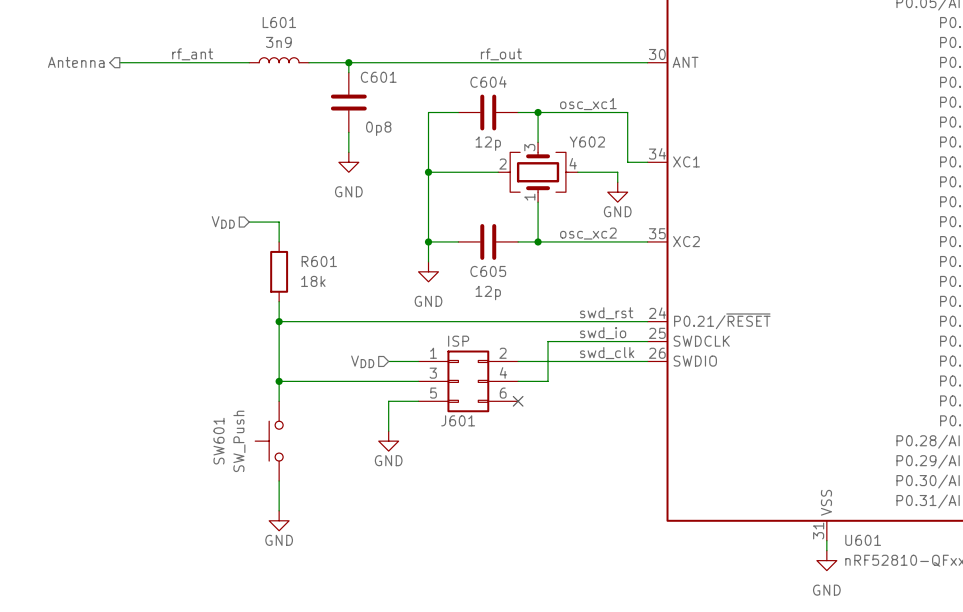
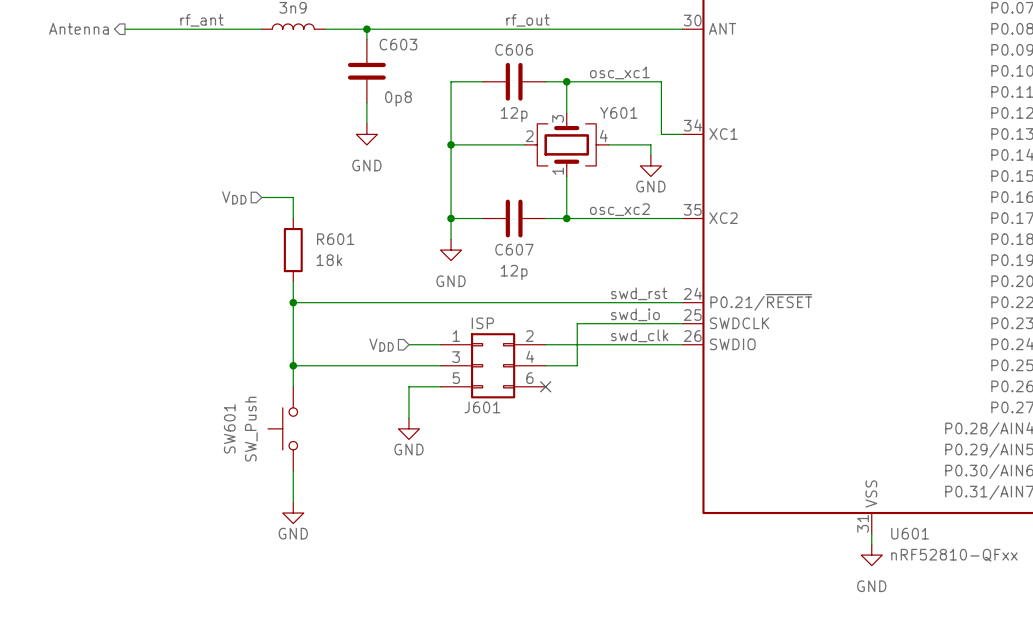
C601 name: C601 (378, 77) -> C603 (398, 44)
C604 name: C604 (488, 82) -> C606 (514, 49)
Y602 name: Y602 (587, 142) -> Y601 (618, 112)
C605 name: C605 (488, 271) -> C607 (514, 249)

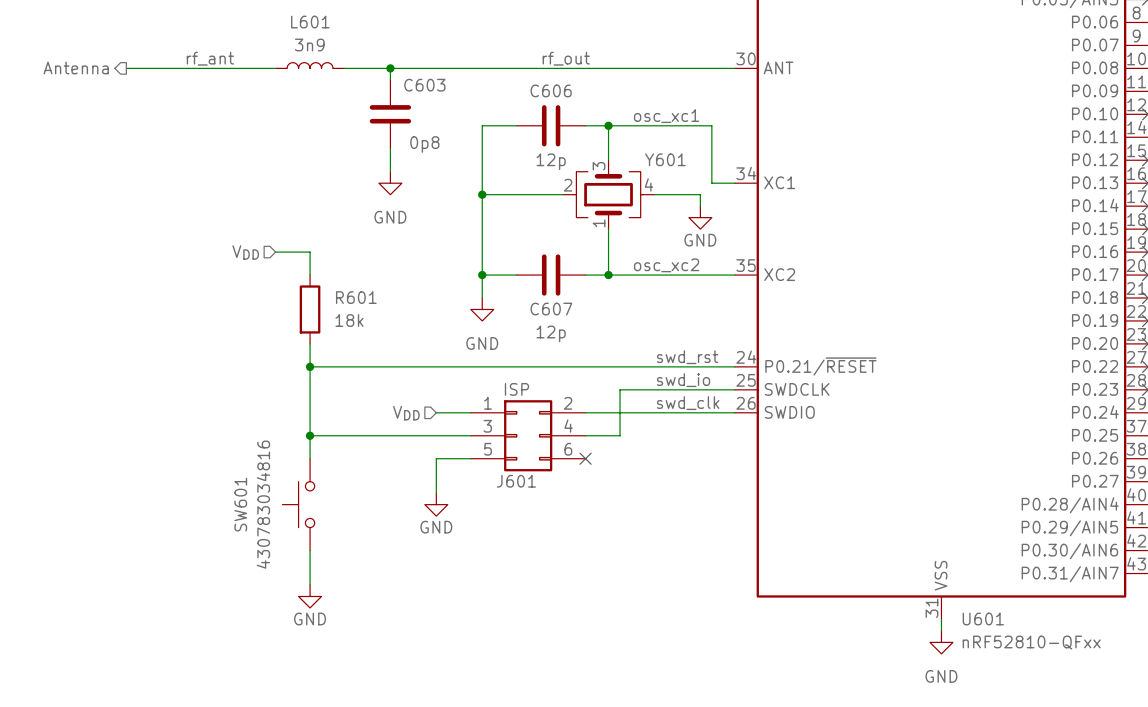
SW601 value: SW_Push (251, 429) -> 430783034816 (263, 504)

